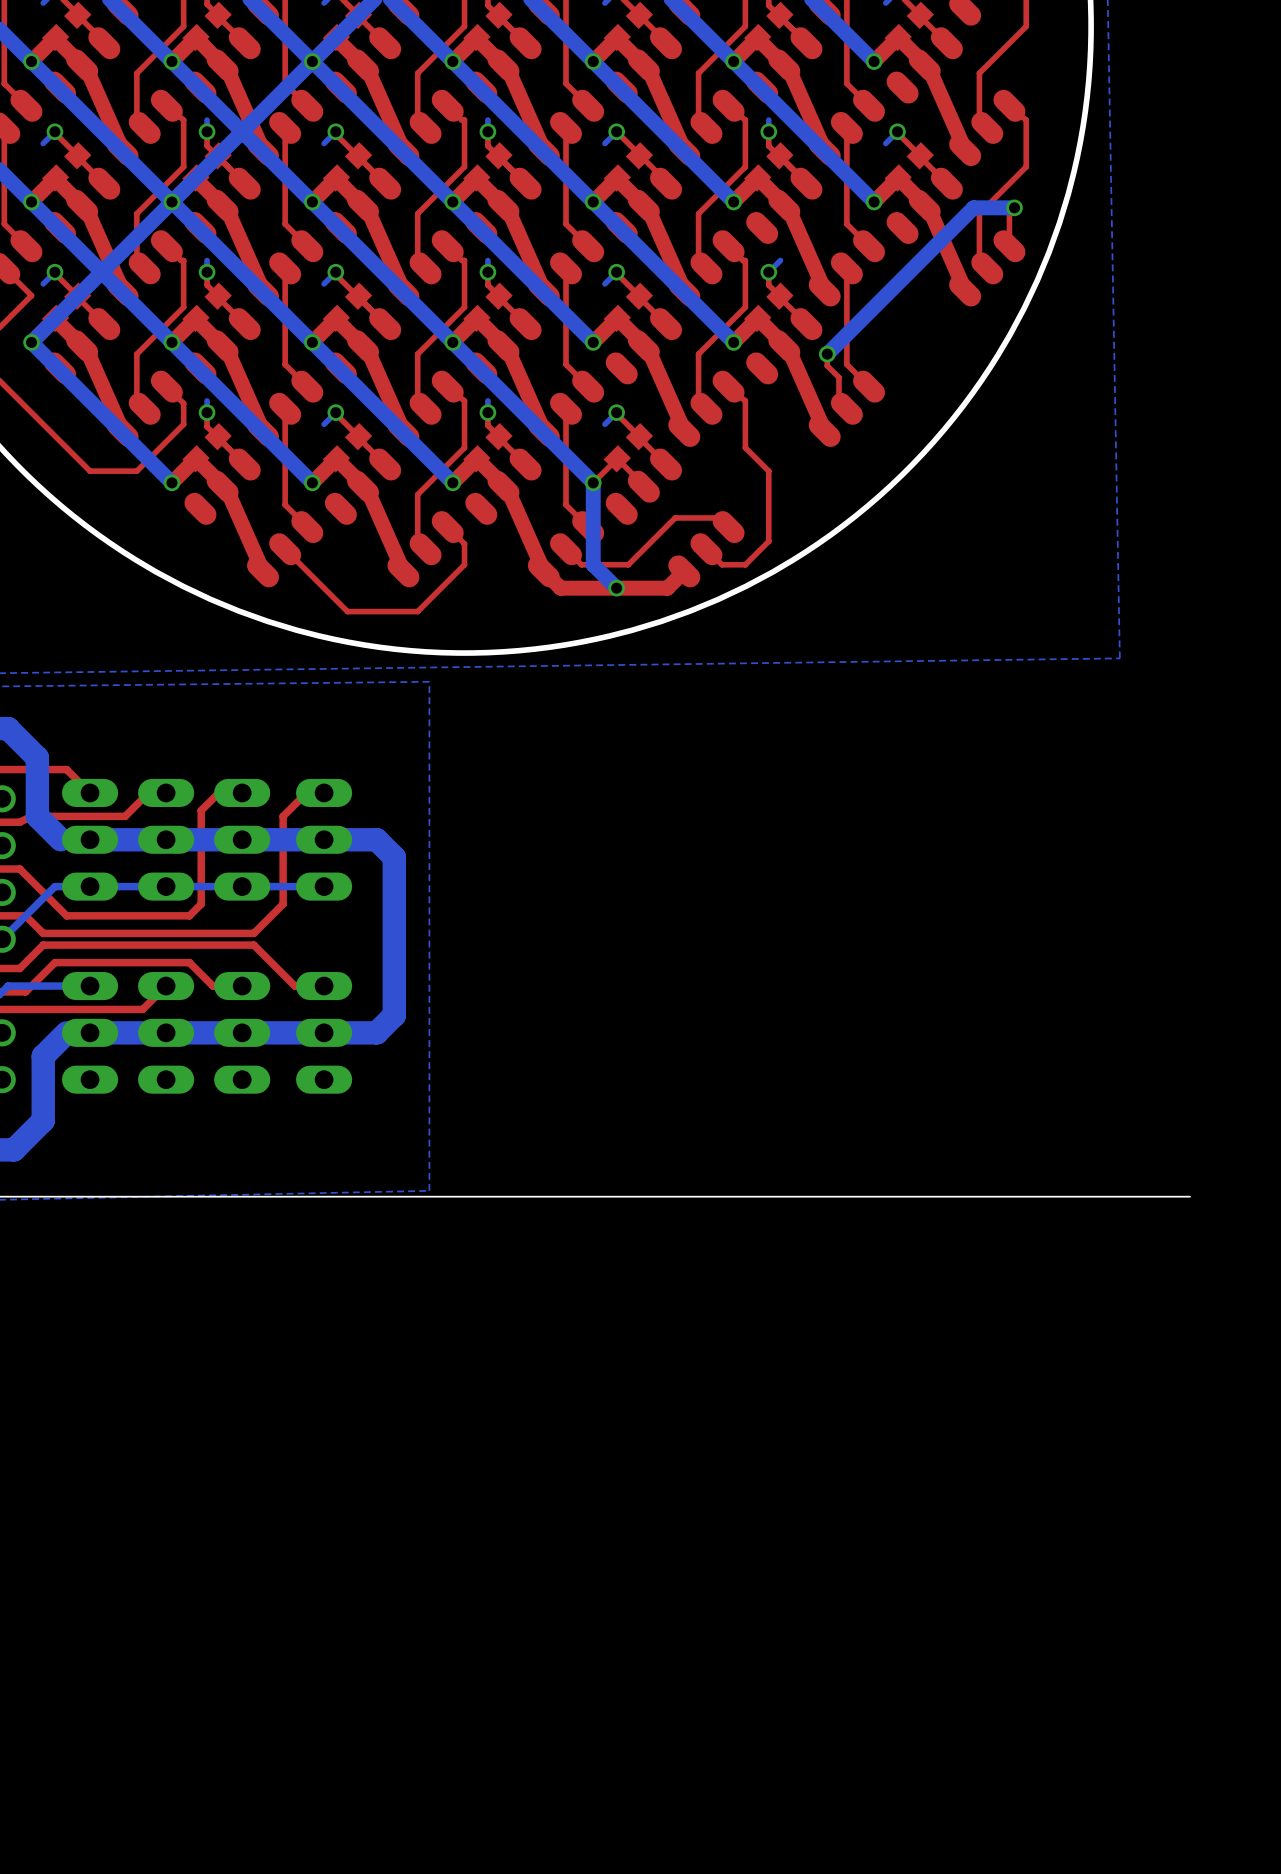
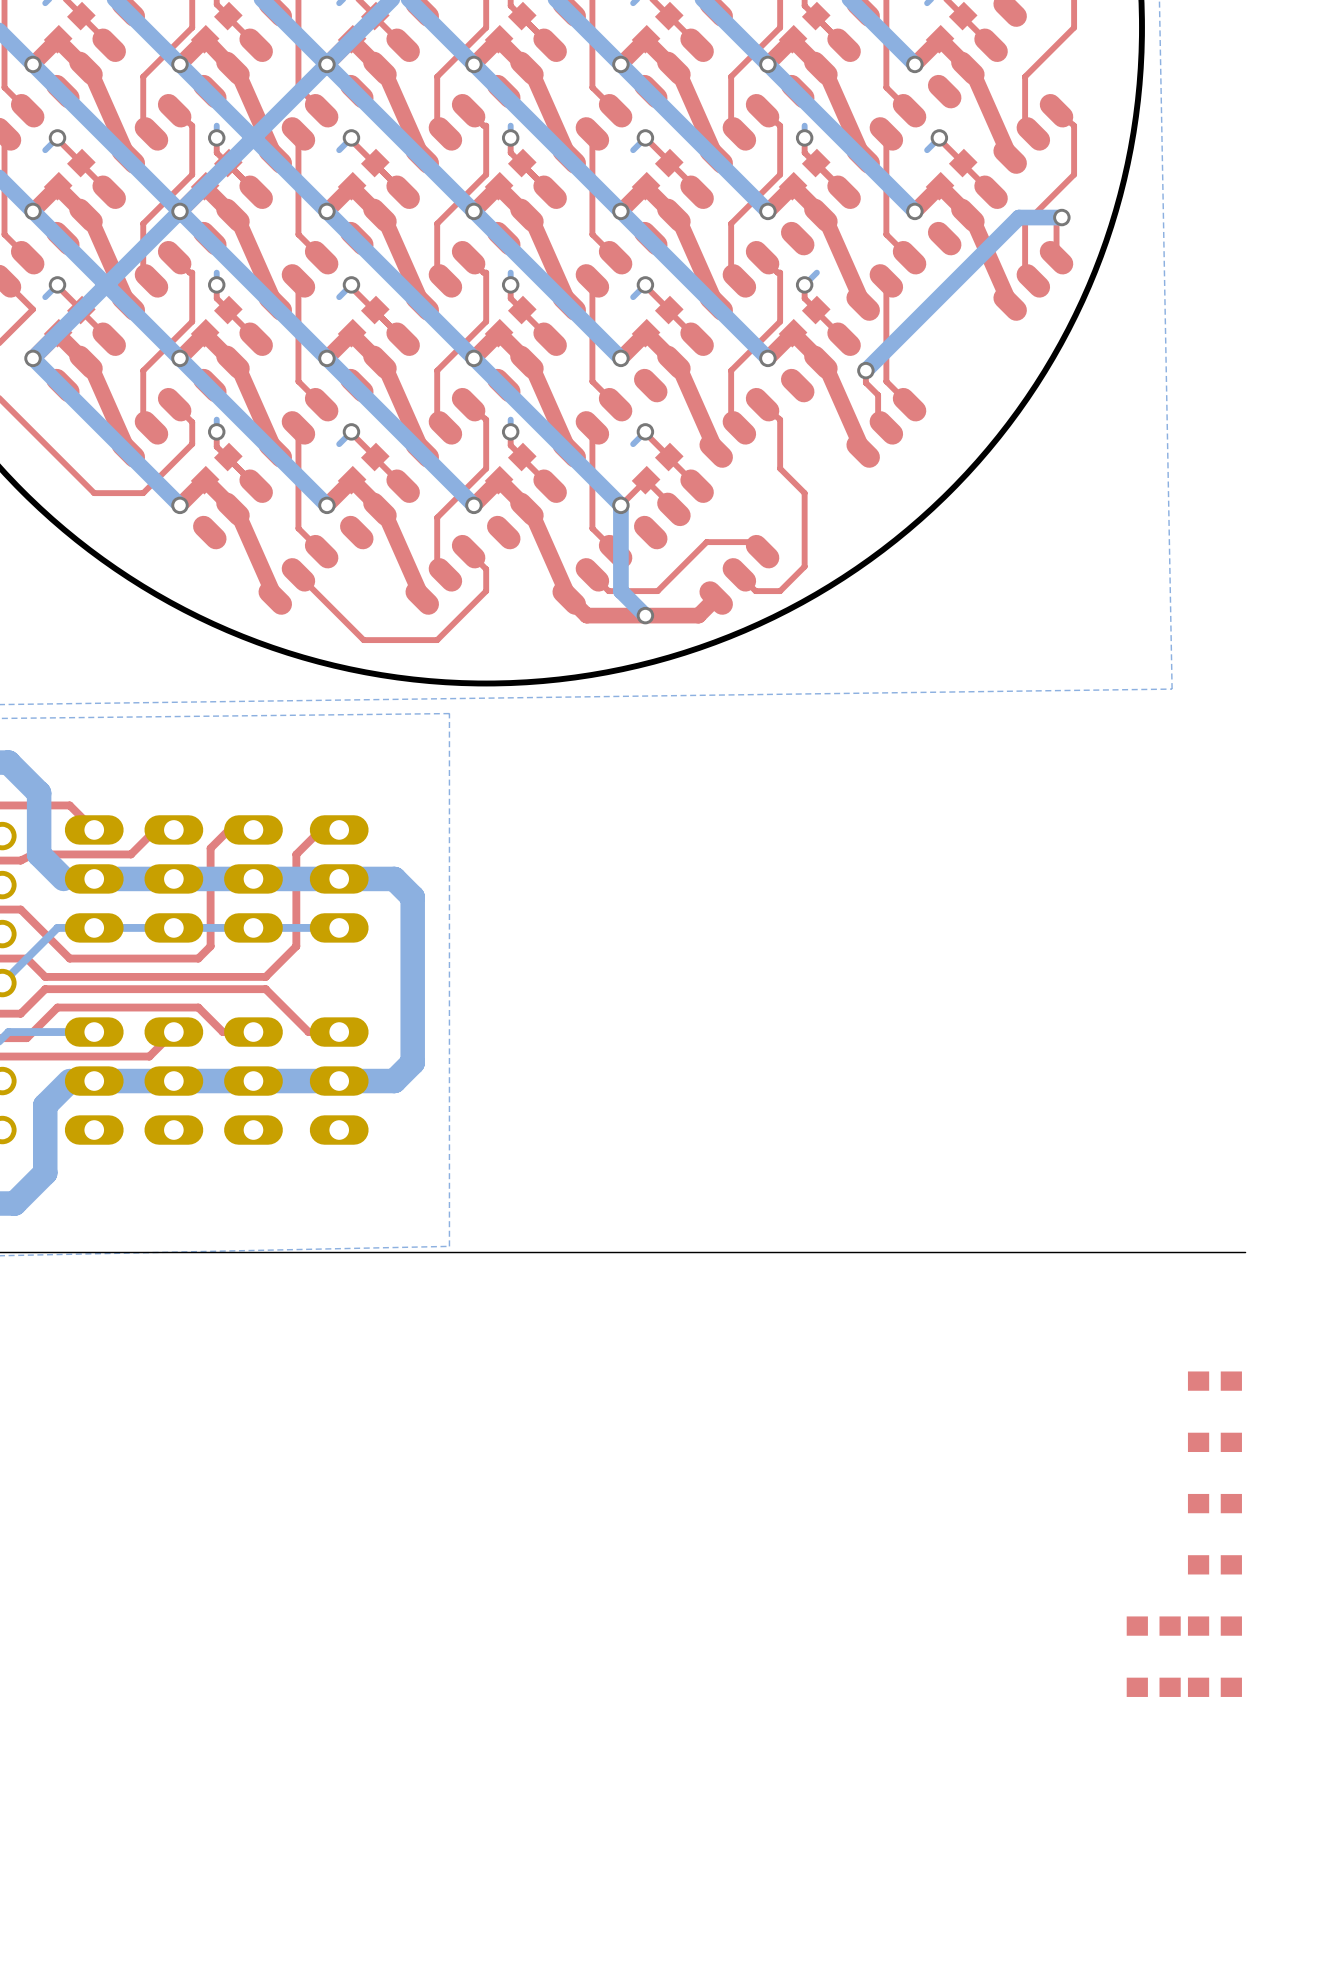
part: none -> (1214, 1381)
part: none -> (1214, 1442)
part: none -> (1214, 1503)
part: none -> (1214, 1564)
part: none -> (1153, 1626)
part: none -> (1214, 1626)
part: none -> (1153, 1687)
part: none -> (1214, 1687)

